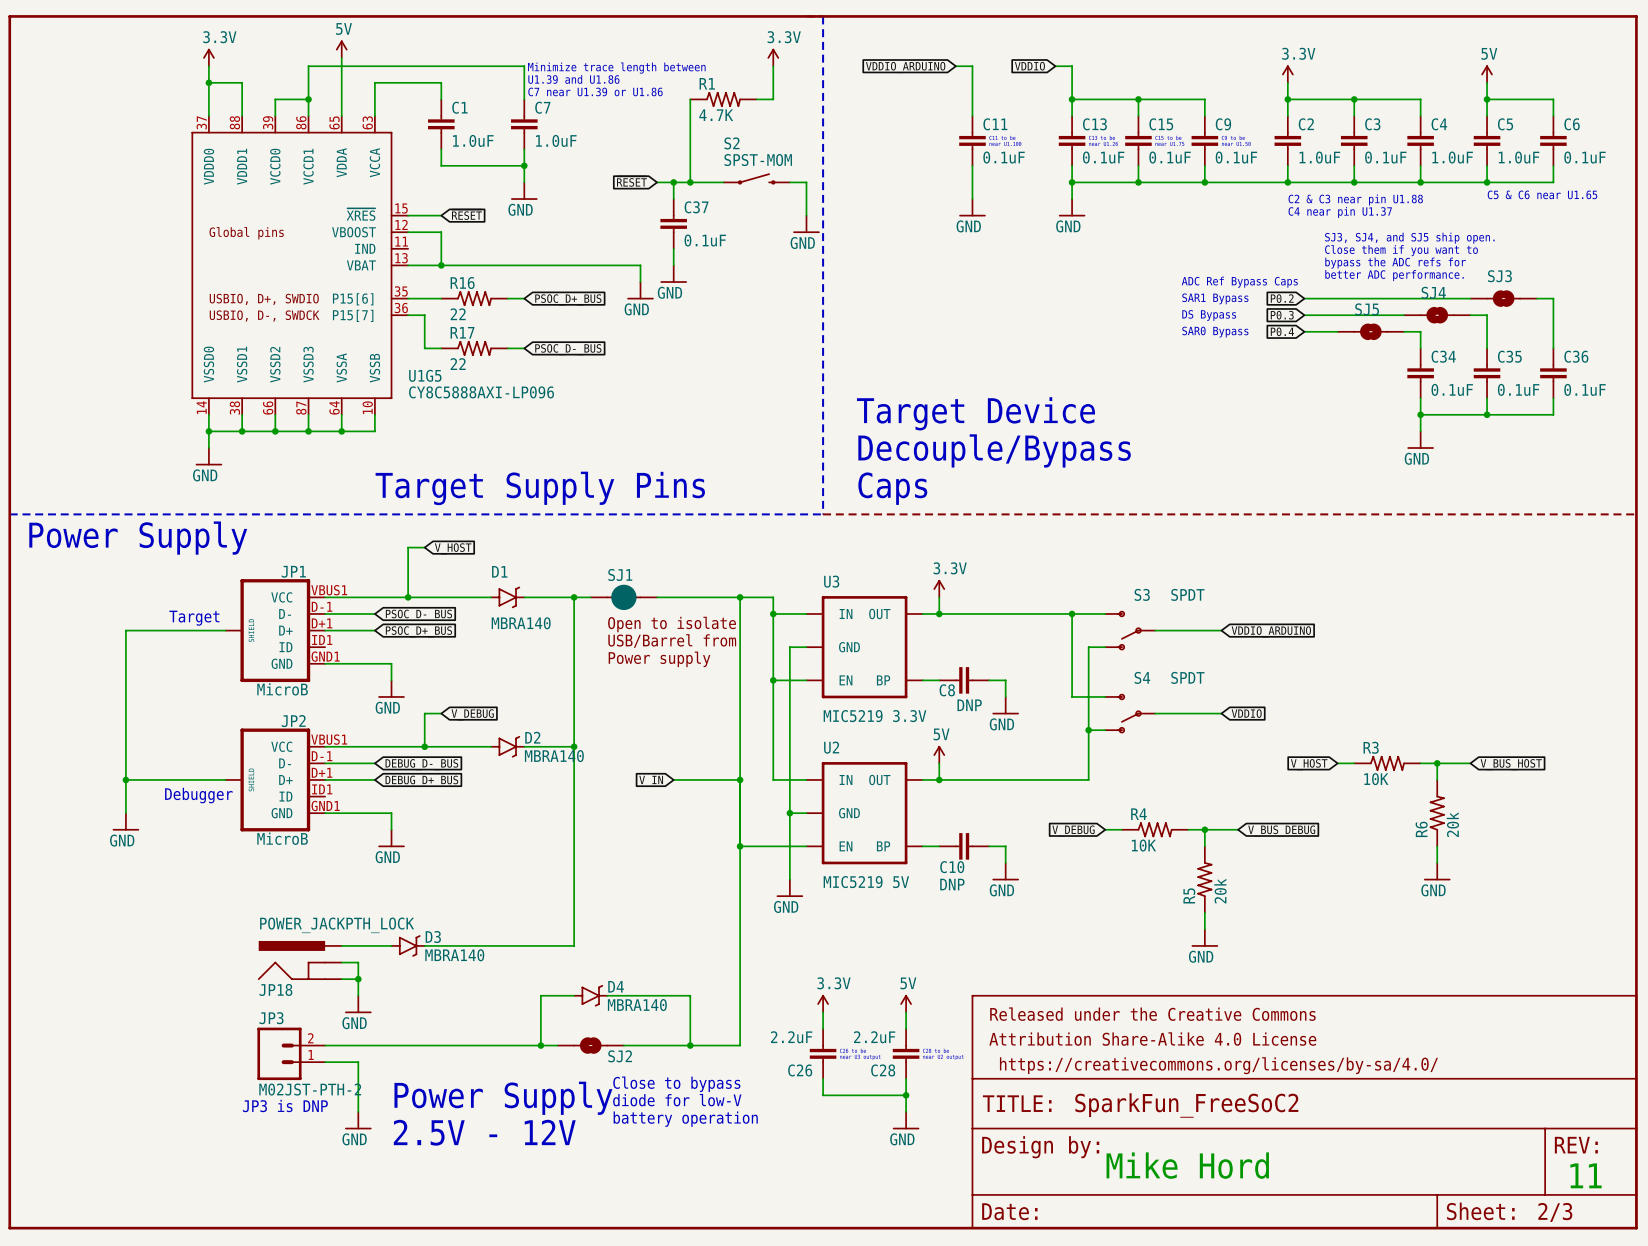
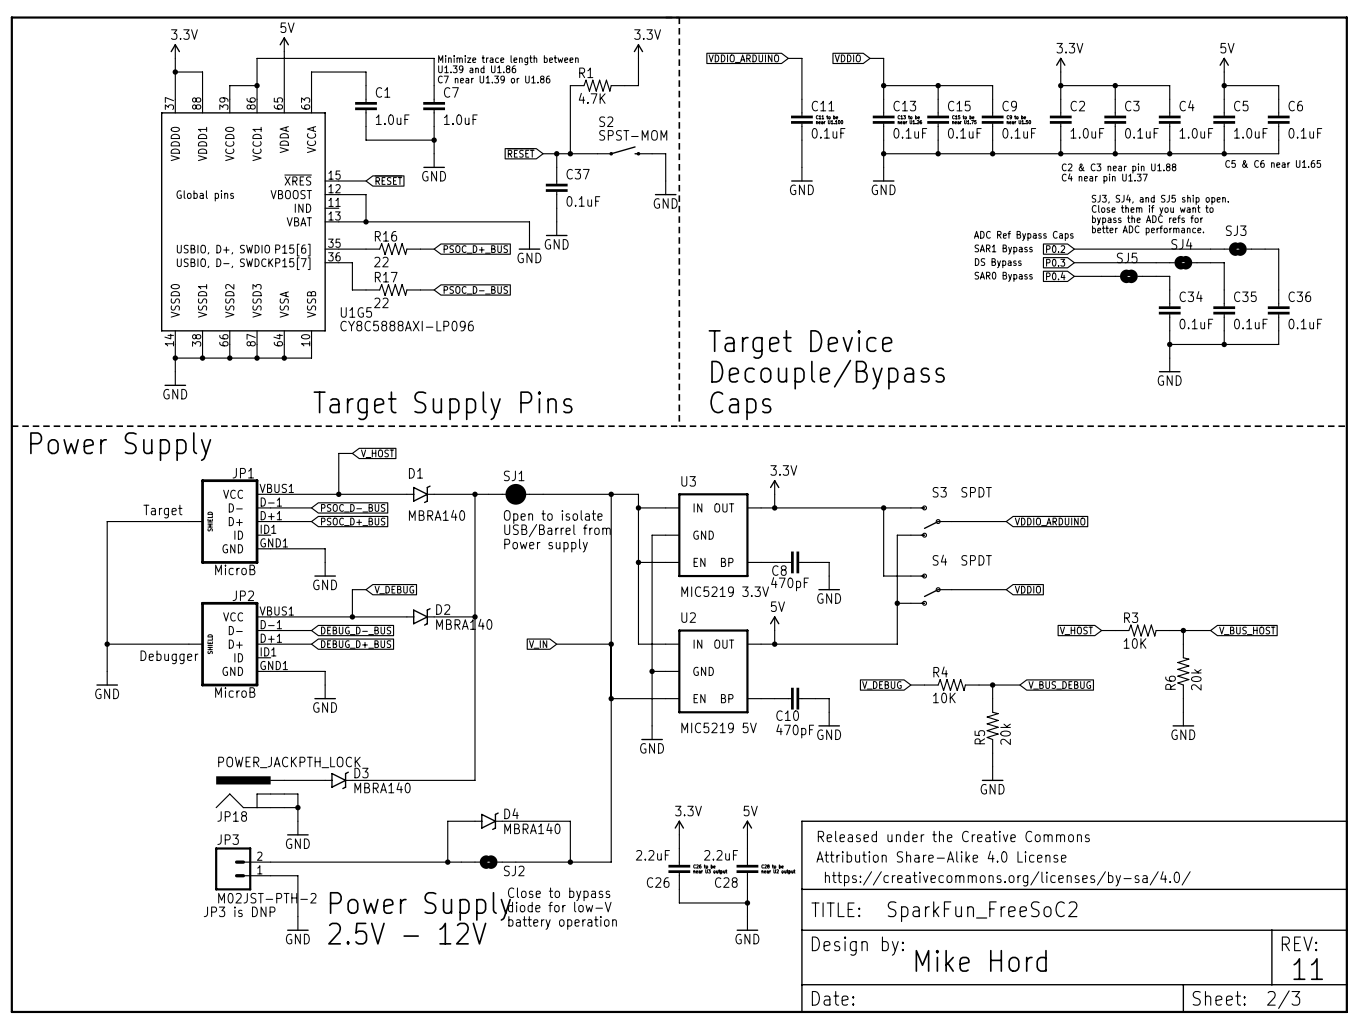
C8 value: DNP (969, 705) -> 470pF (789, 584)
C10 value: DNP (952, 884) -> 470pF (795, 731)

